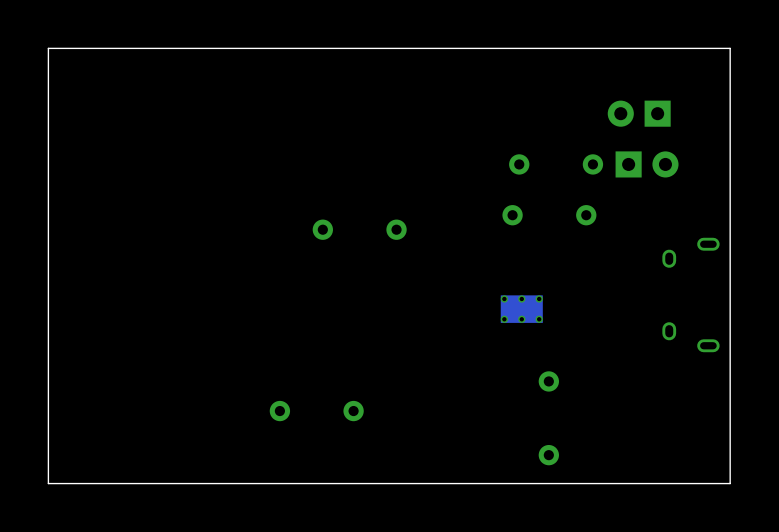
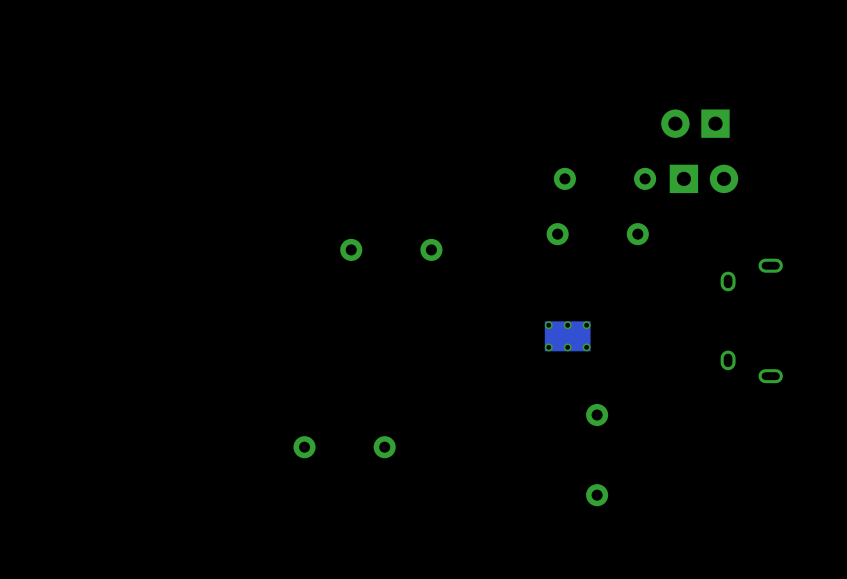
board edge: (730, 48) (48, 48) (48, 483) (730, 483) (730, 48) -> none

